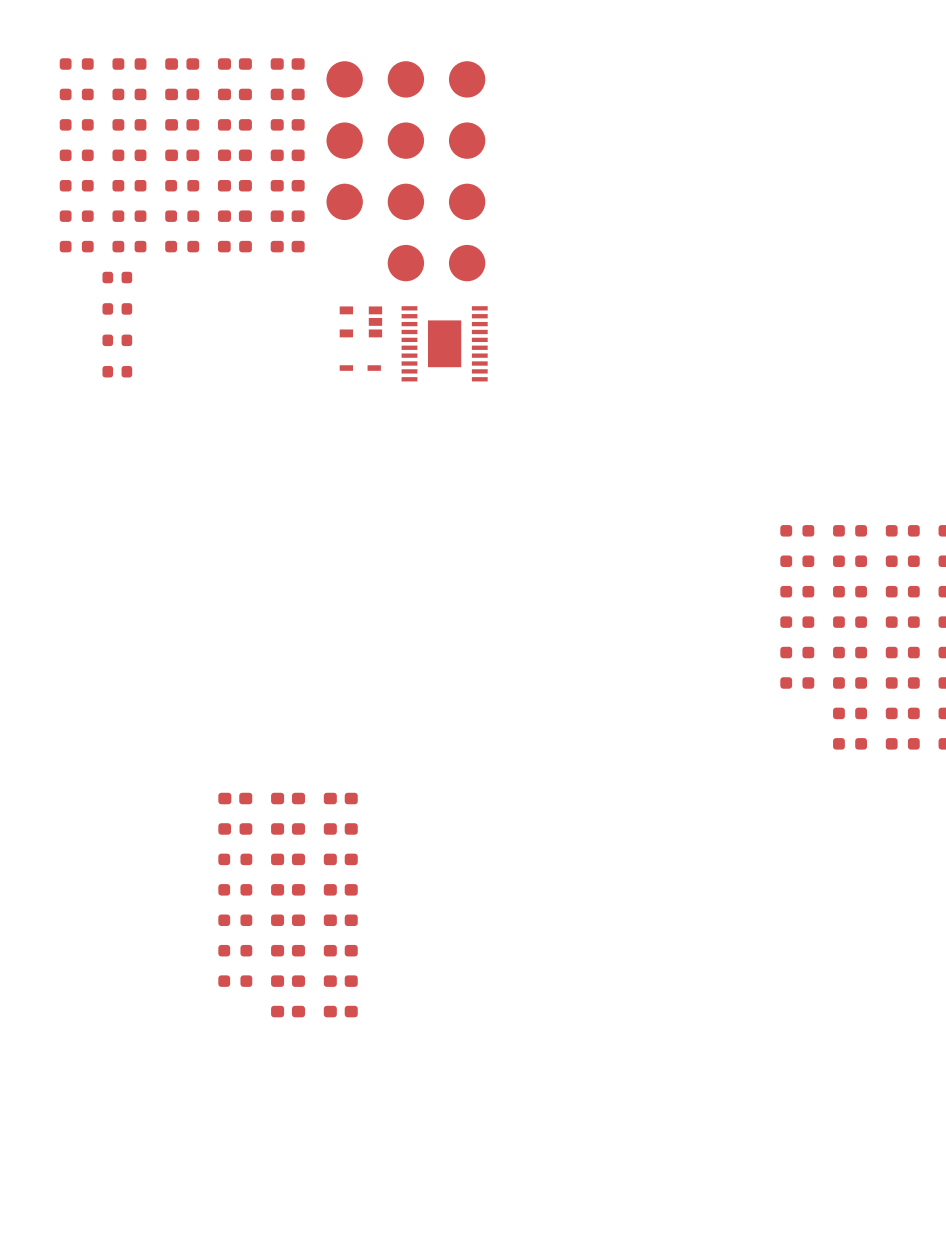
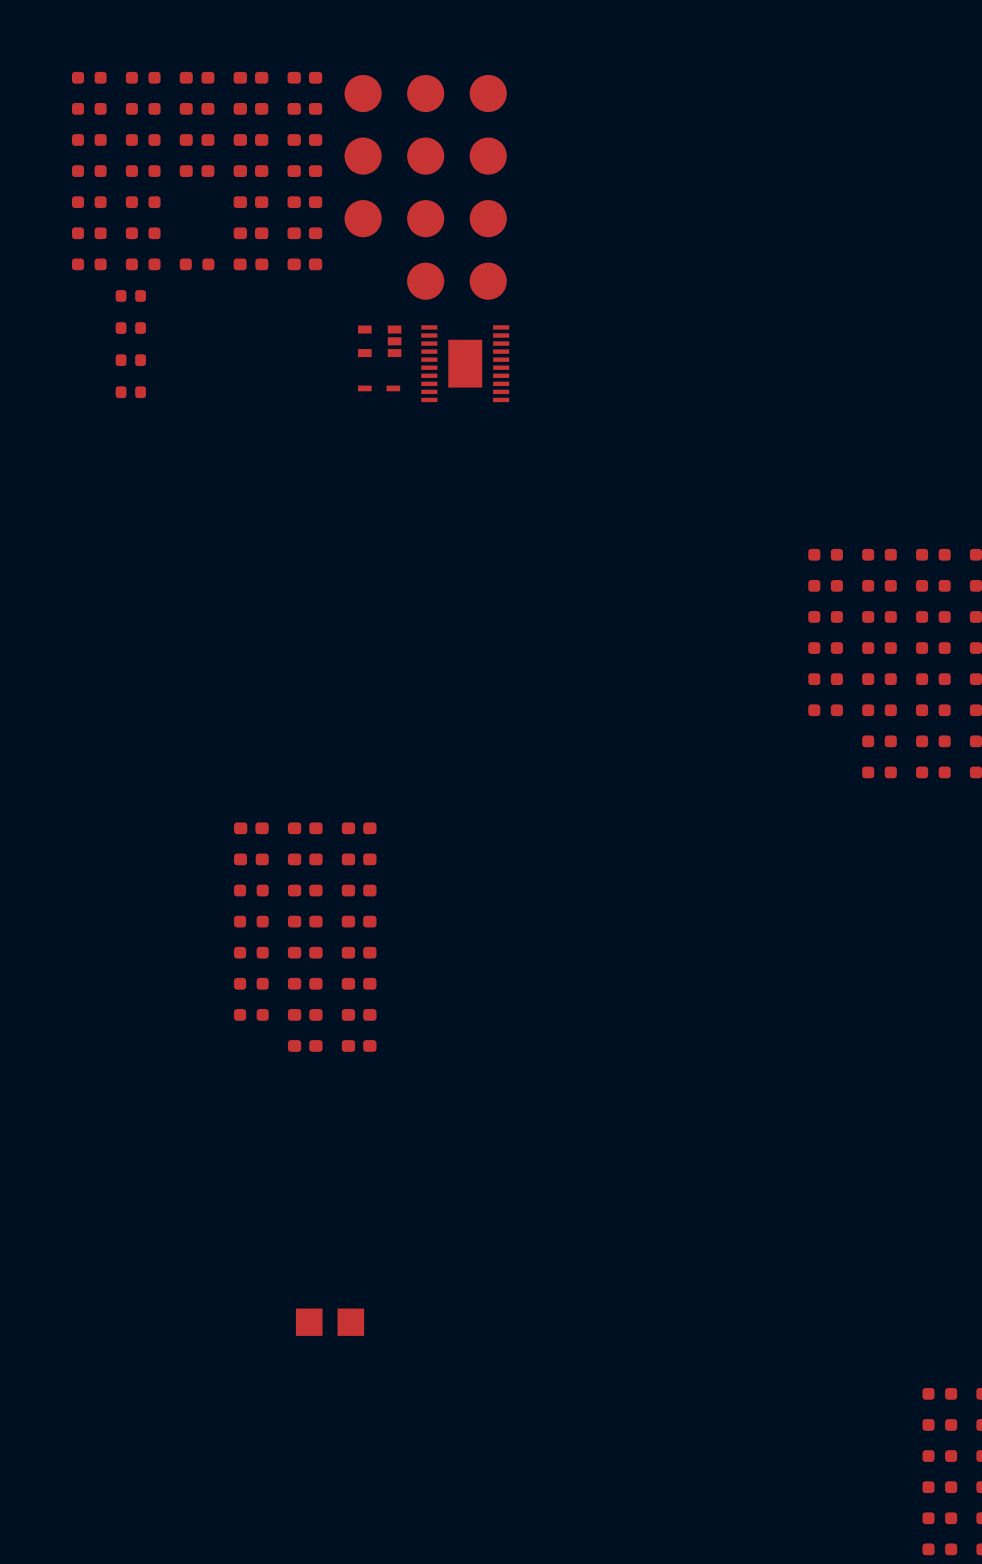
part: (182, 185) -> none
part: (182, 216) -> none

